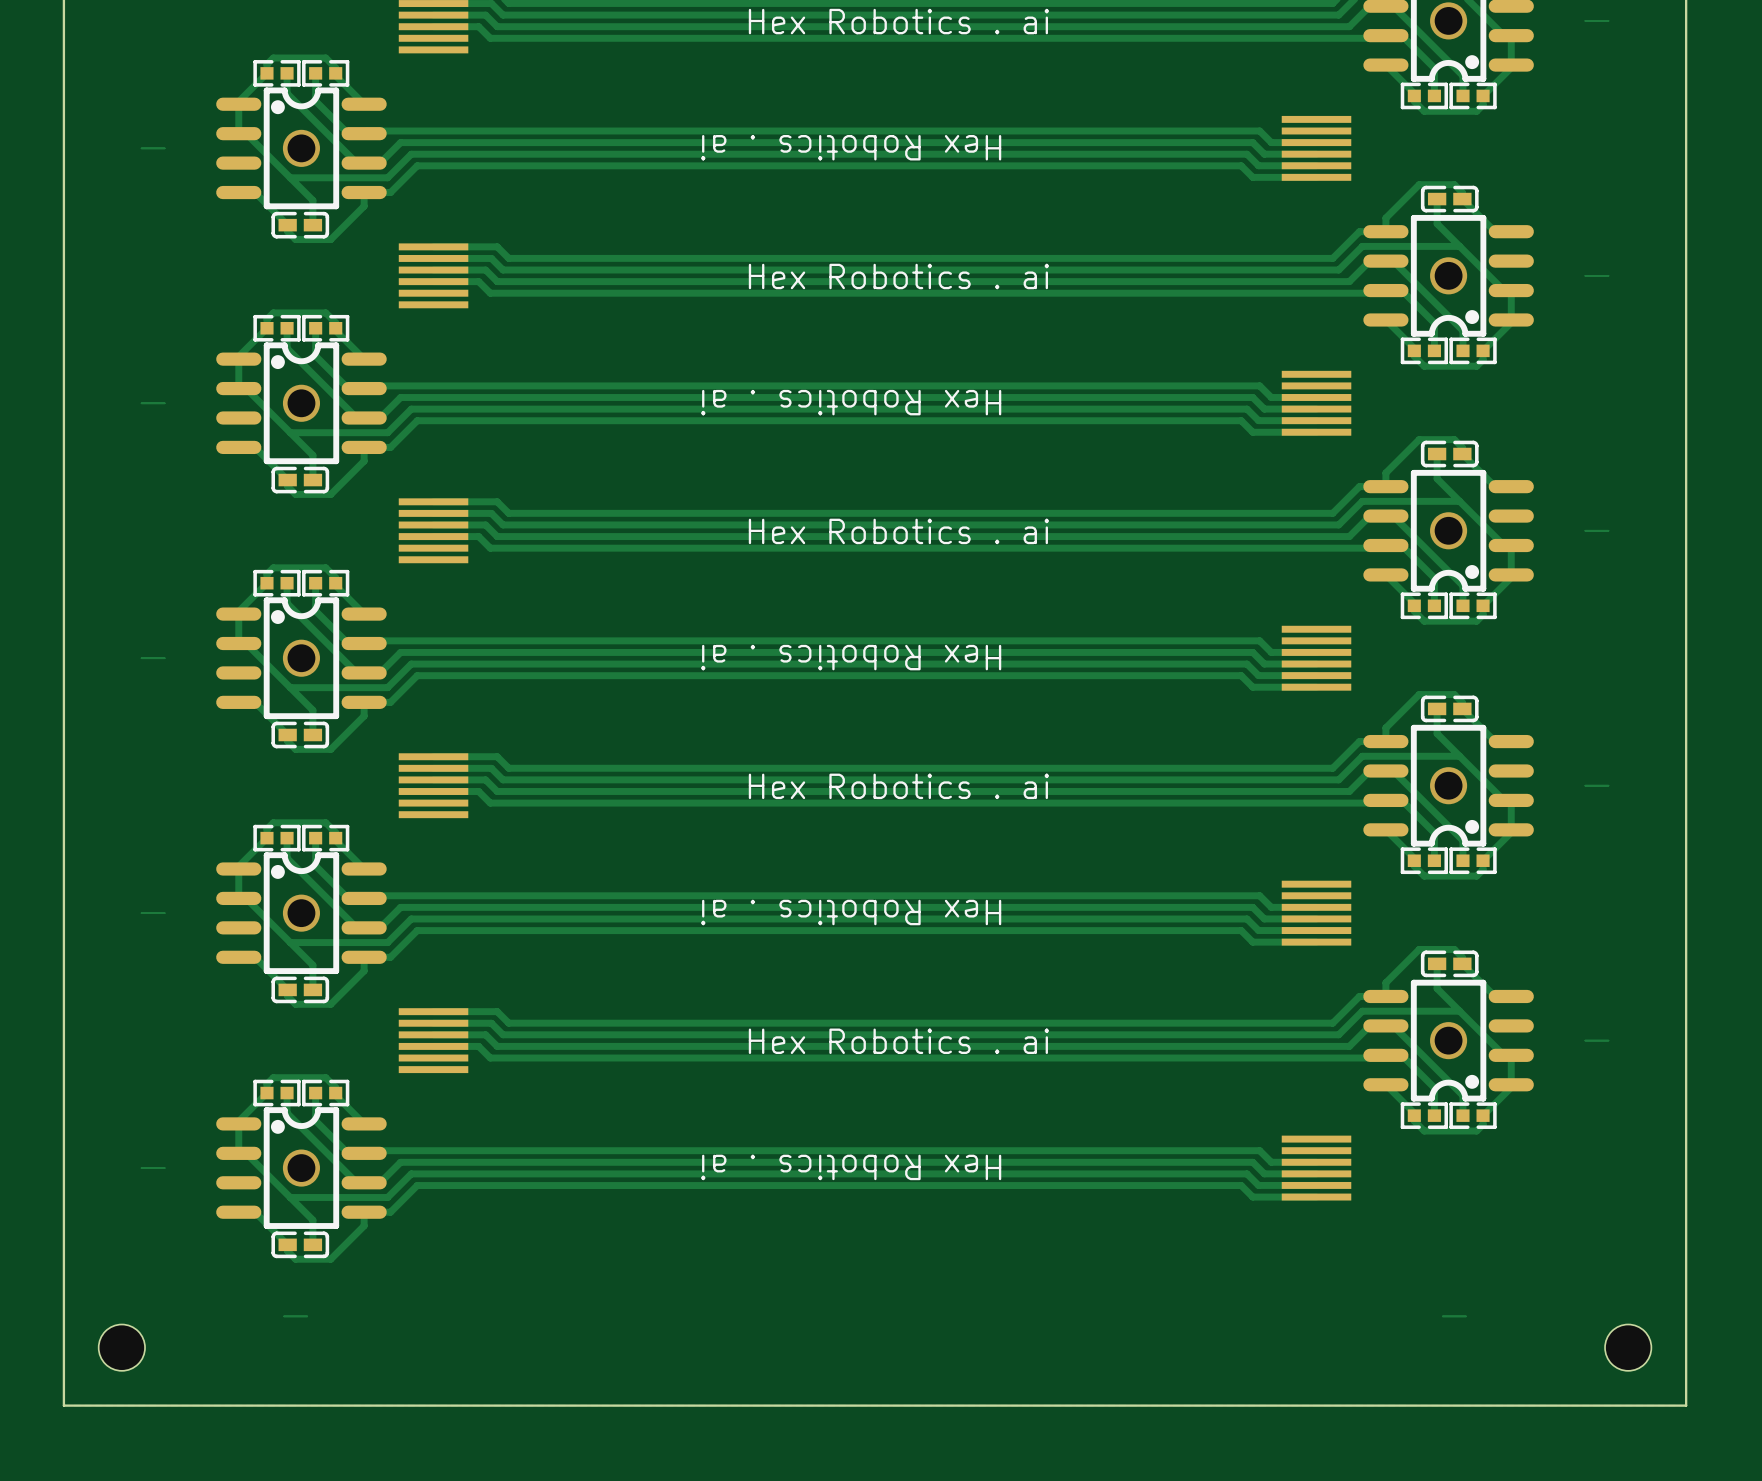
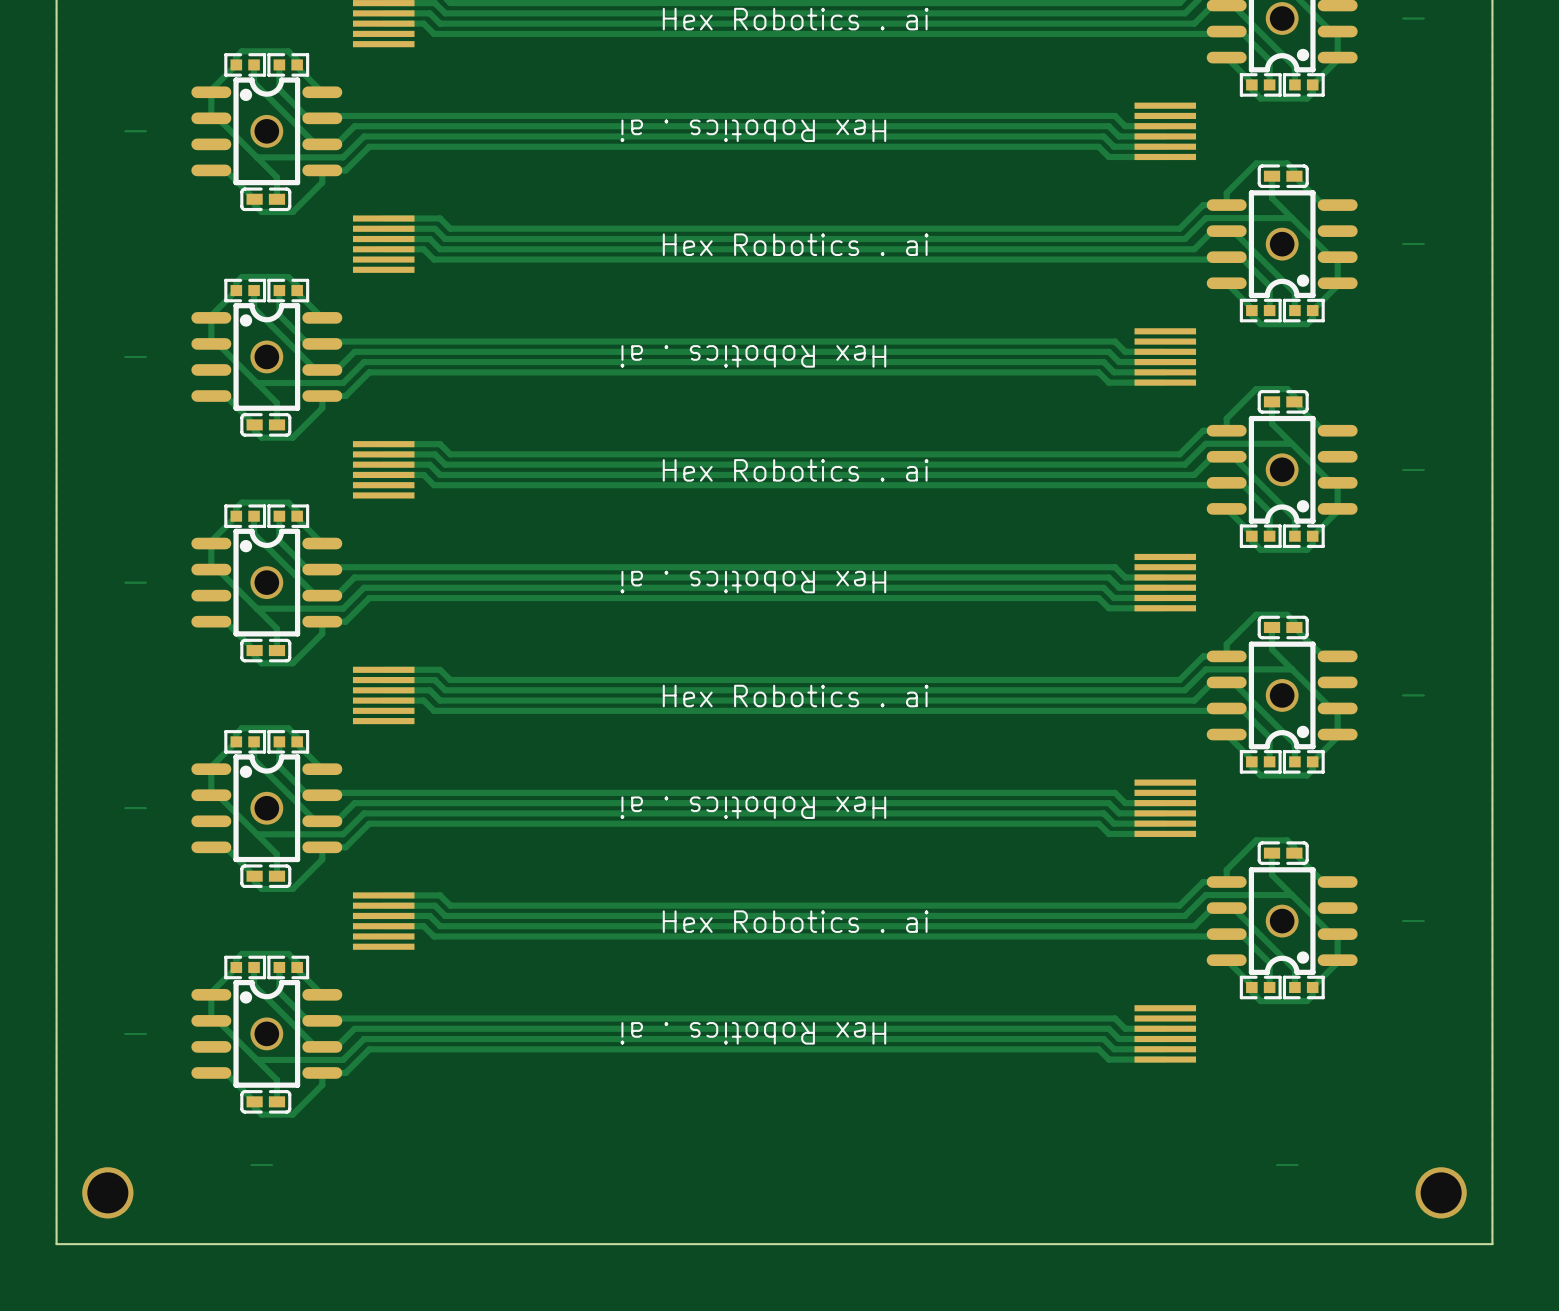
part: (121, 1347) -> none
via: none -> (107, 1192)
part: (1628, 1347) -> none
via: none -> (1441, 1192)

